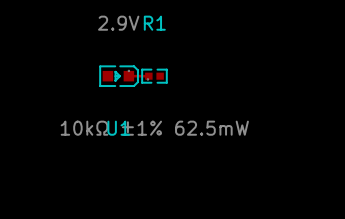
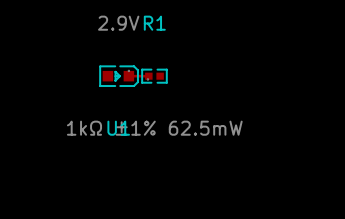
R1 value: 10kΩ ±1% 62.5mW (154, 128) -> 1kΩ ±1% 62.5mW (154, 128)

